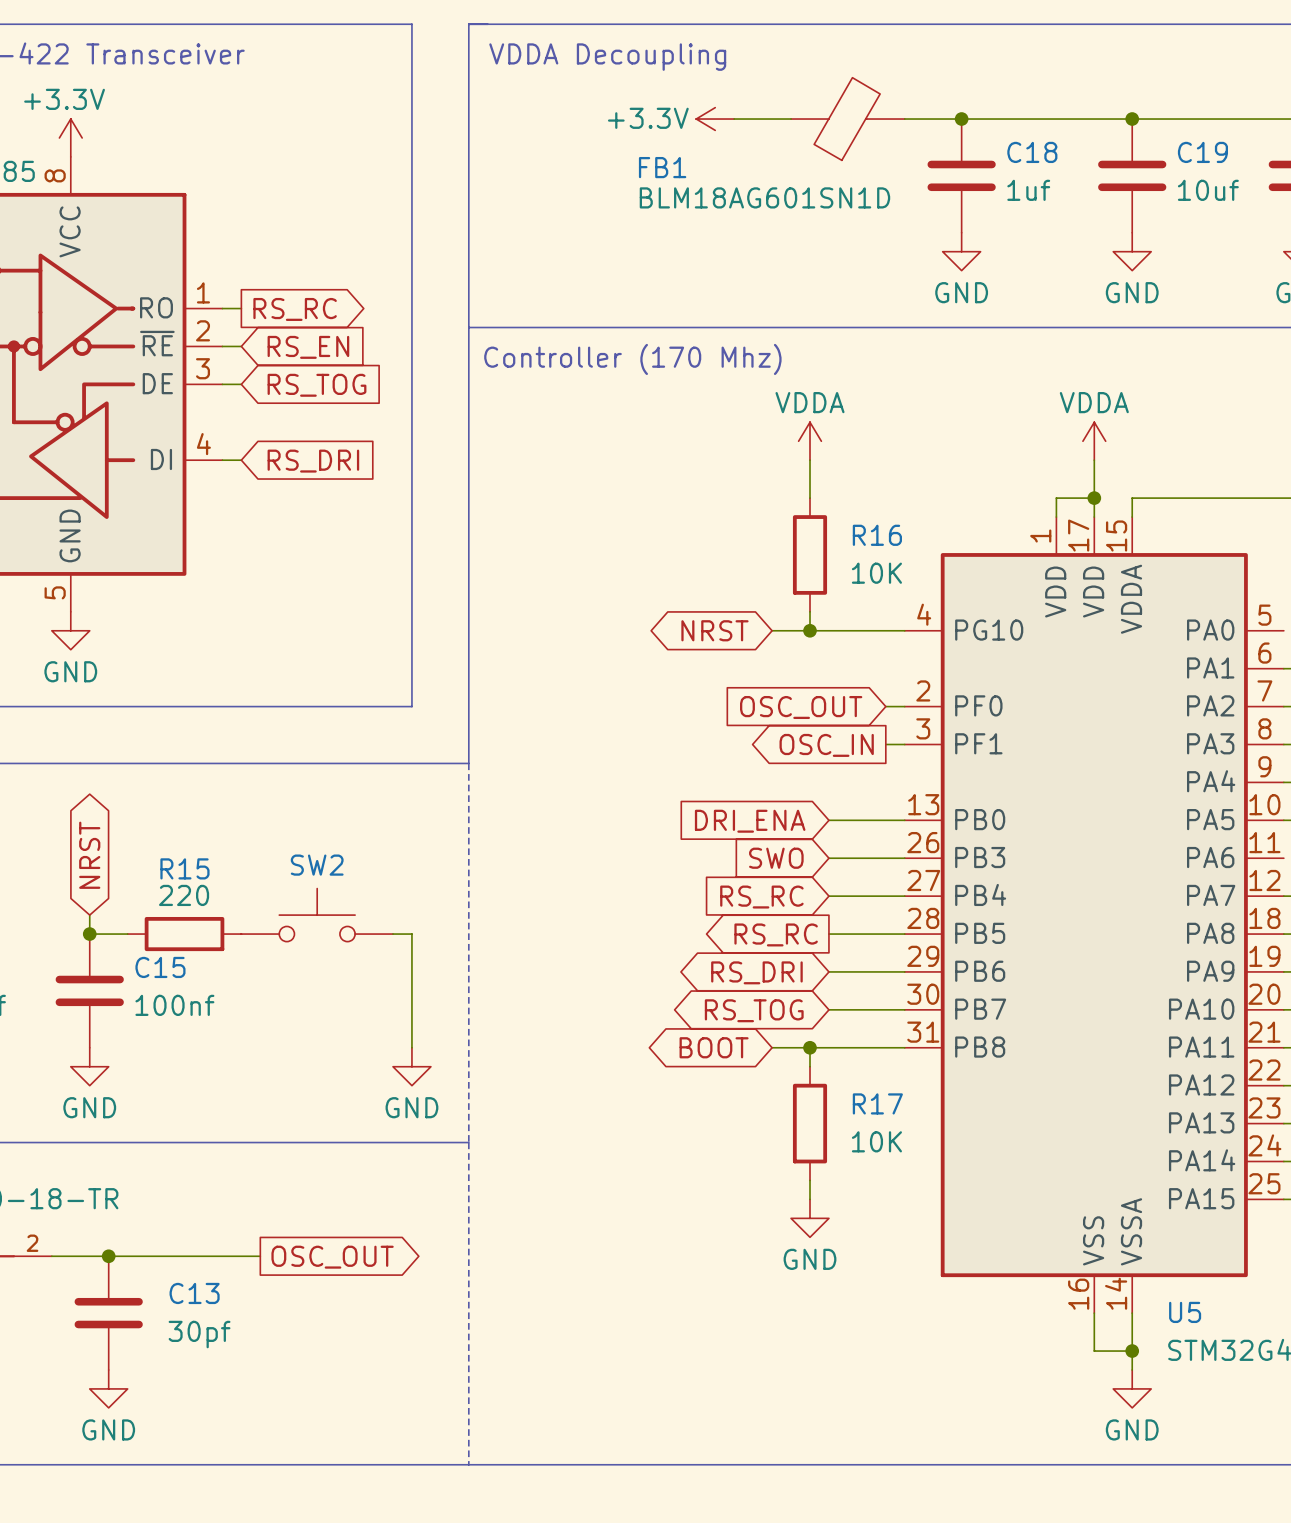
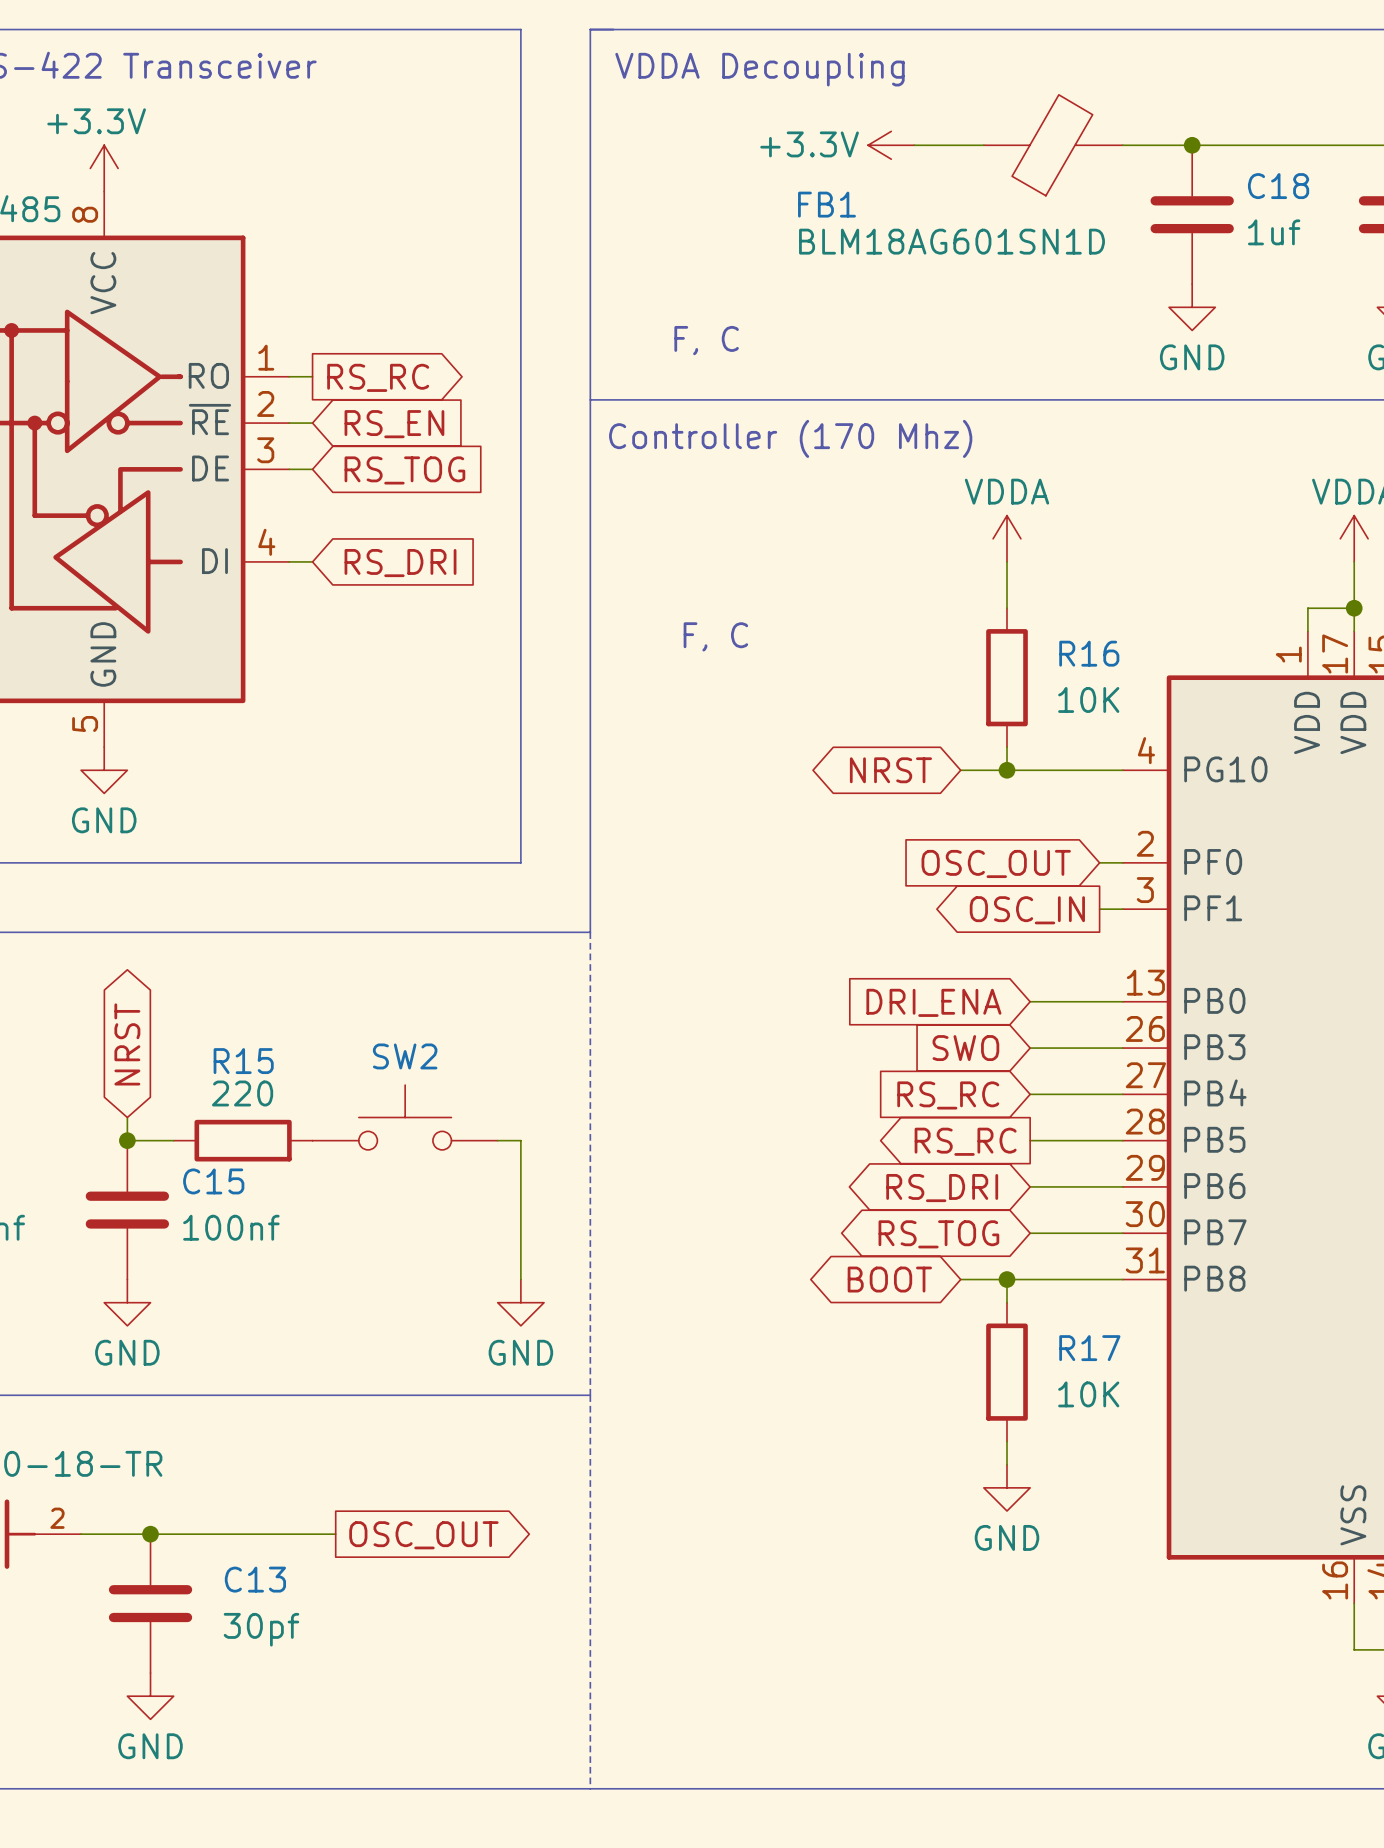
text: none -> F, C (706, 340)
text: none -> F, C (715, 636)

